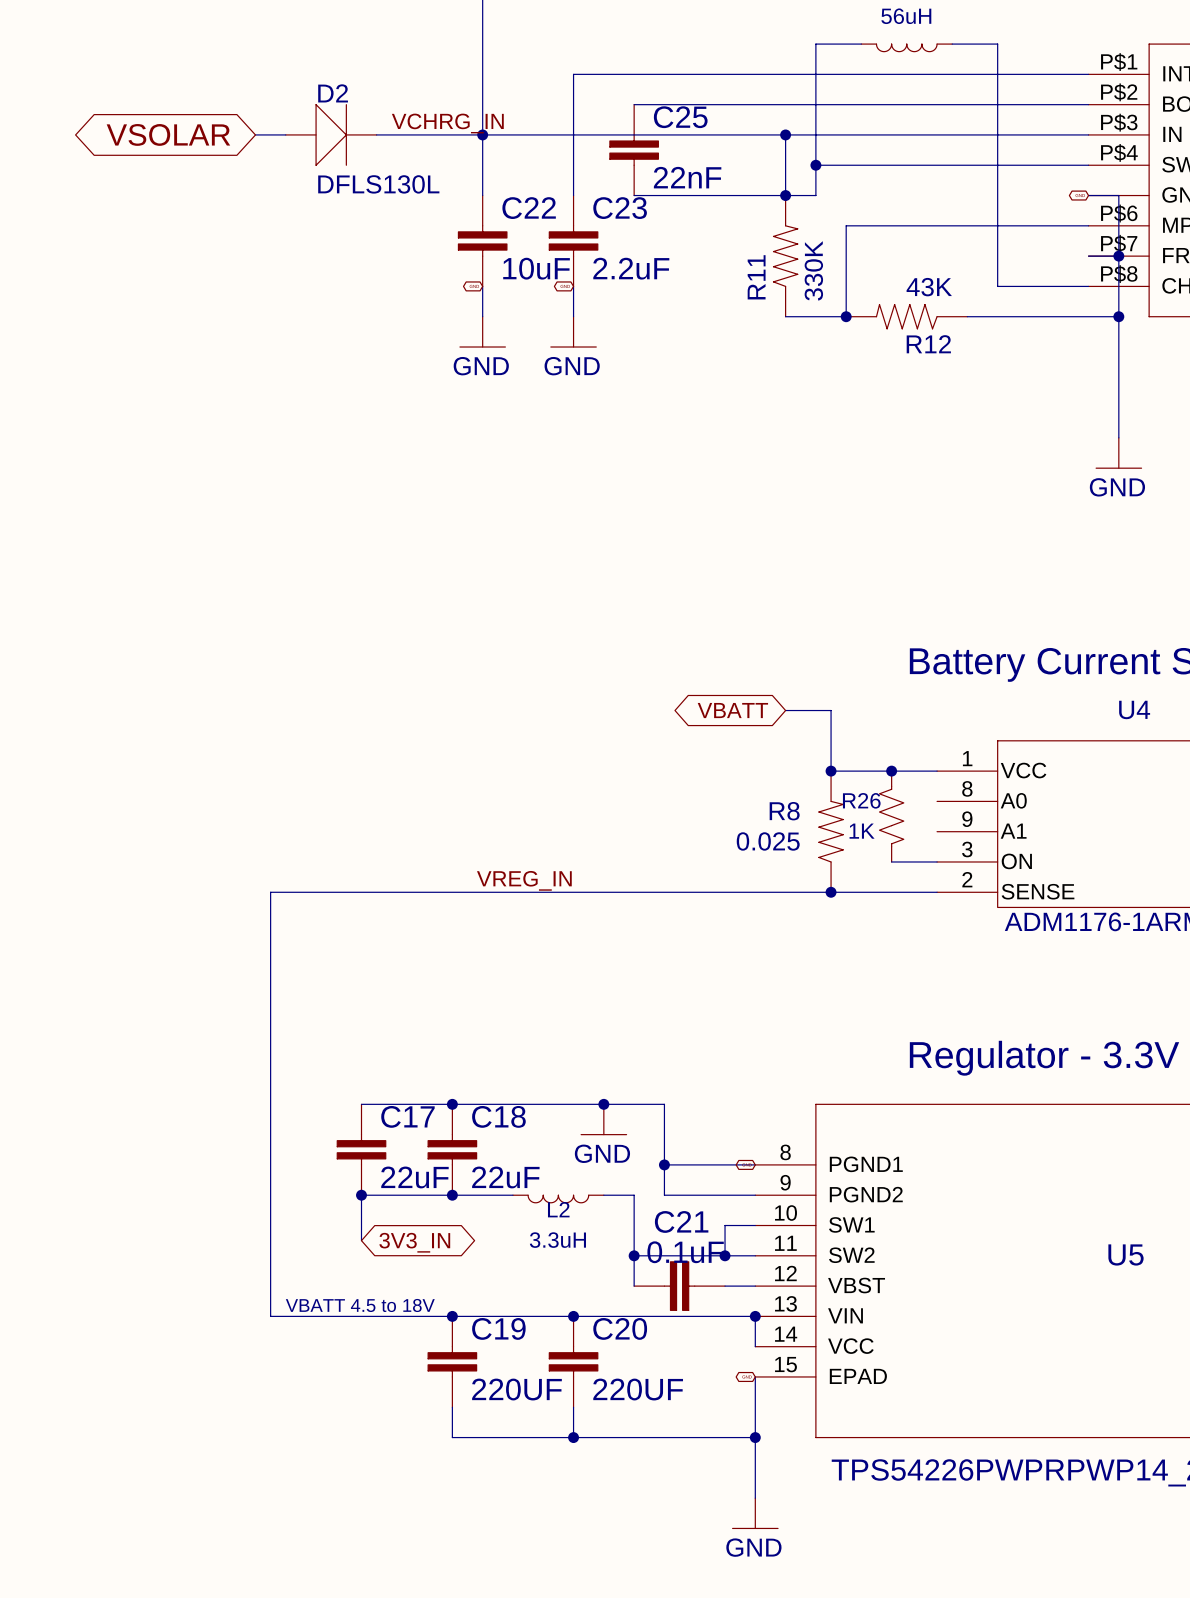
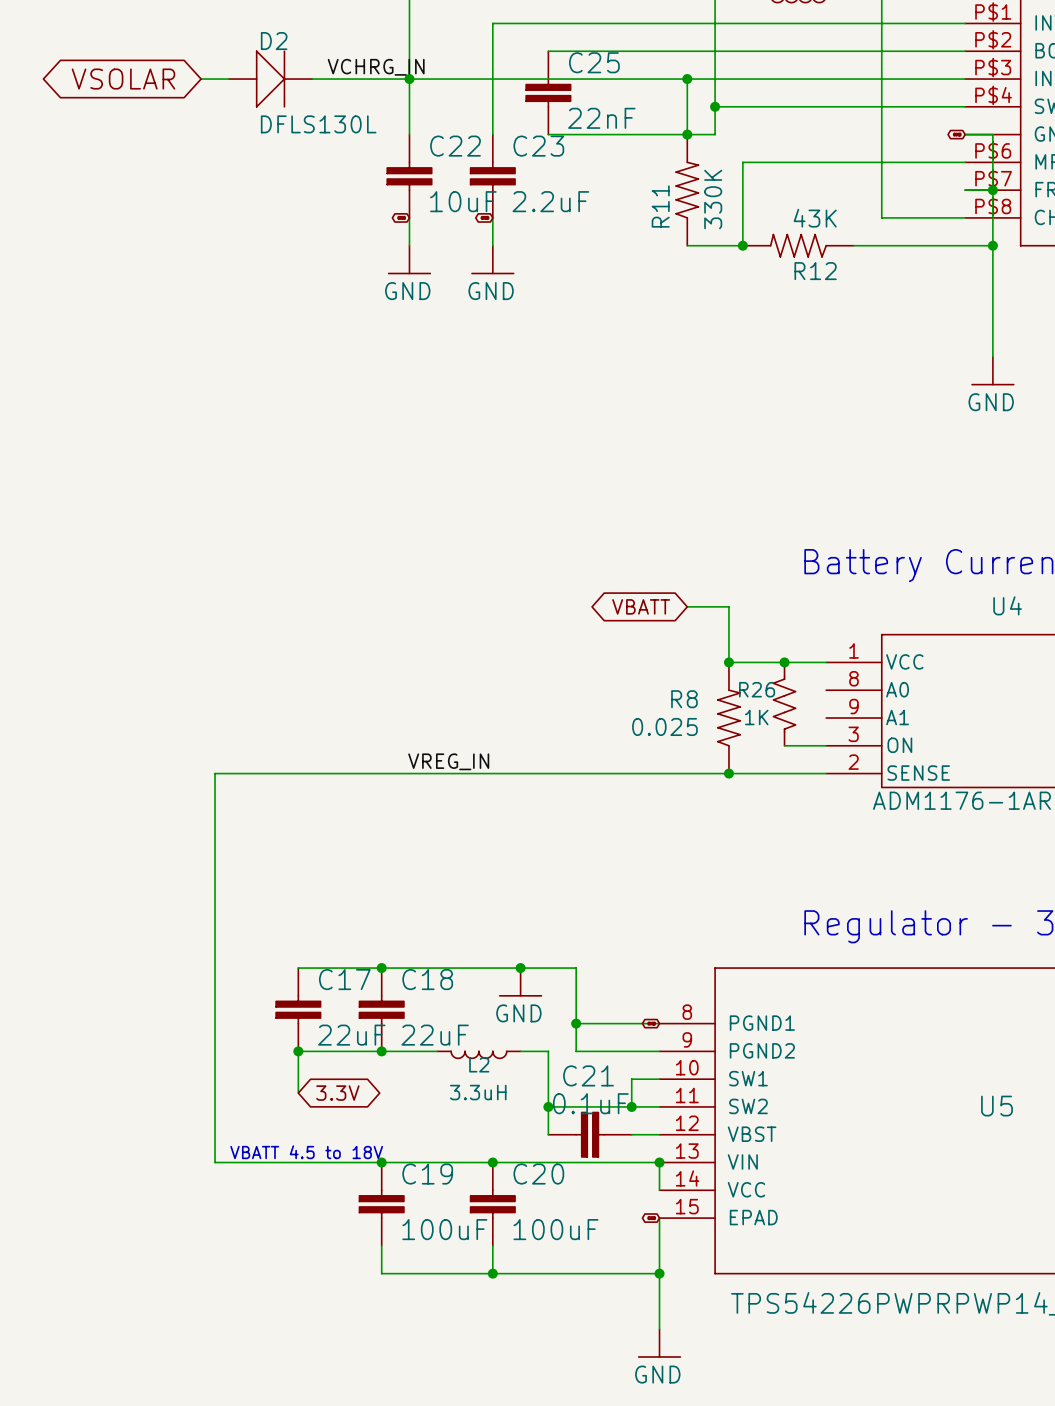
global label: 3V3_IN (414, 1242) -> 3.3V (337, 1093)
C19 value: 220UF (516, 1389) -> 100uF (444, 1229)
C20 value: 220UF (638, 1389) -> 100uF (555, 1229)

